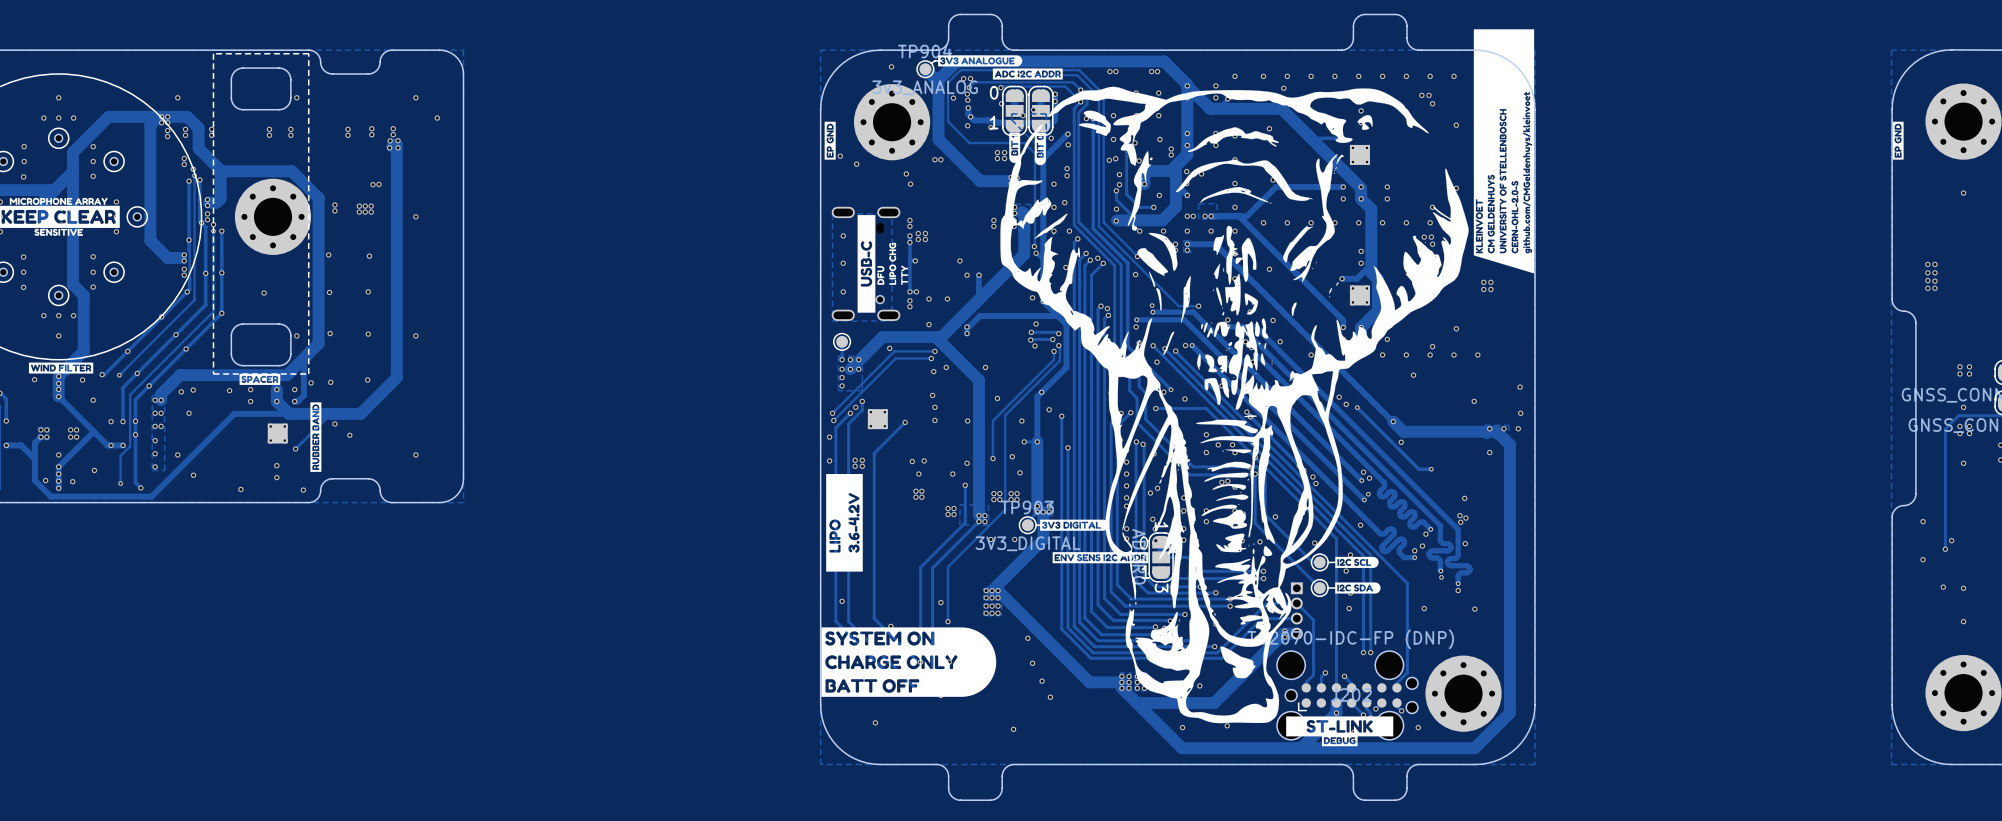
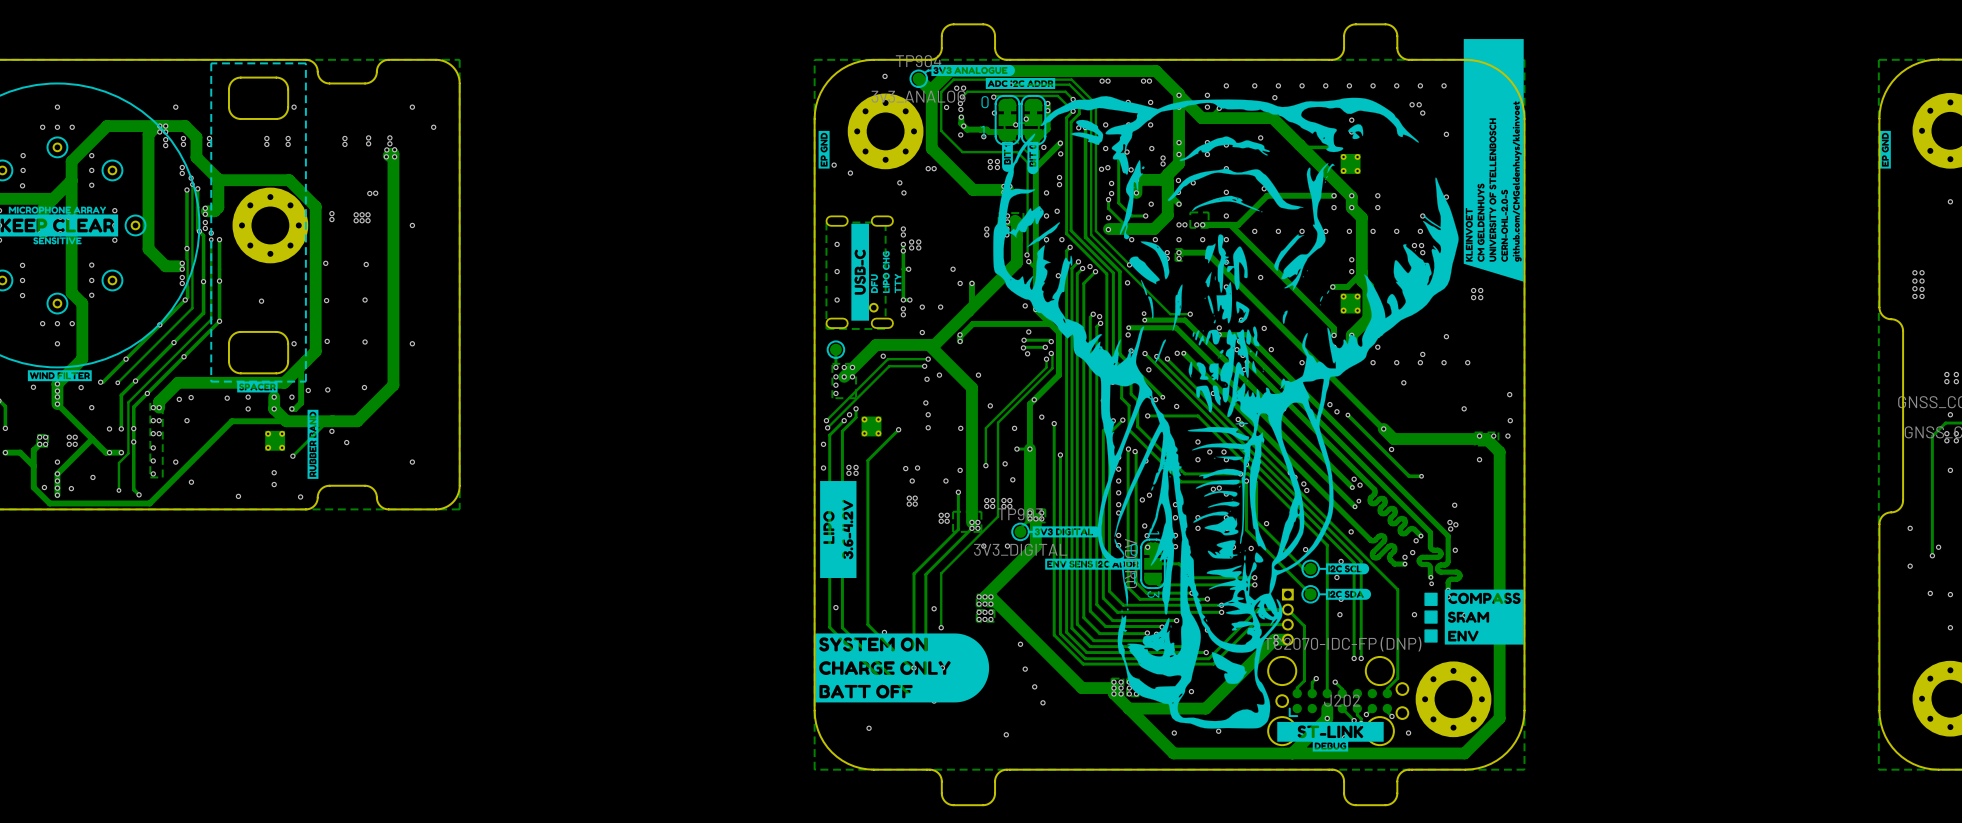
drawing shape: [826, 474, 863, 572] -> [820, 481, 857, 579]
drawing: none -> [1424, 589, 1524, 645]

